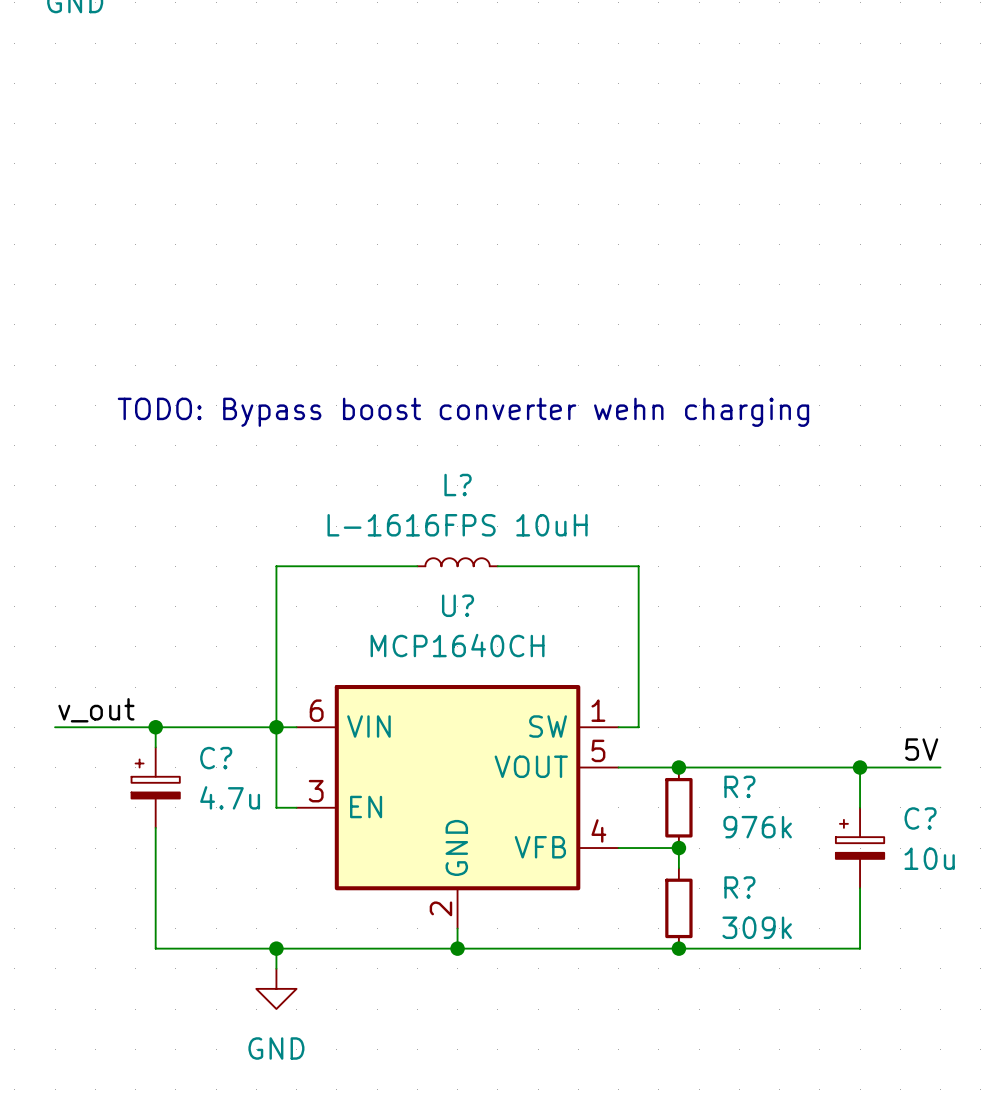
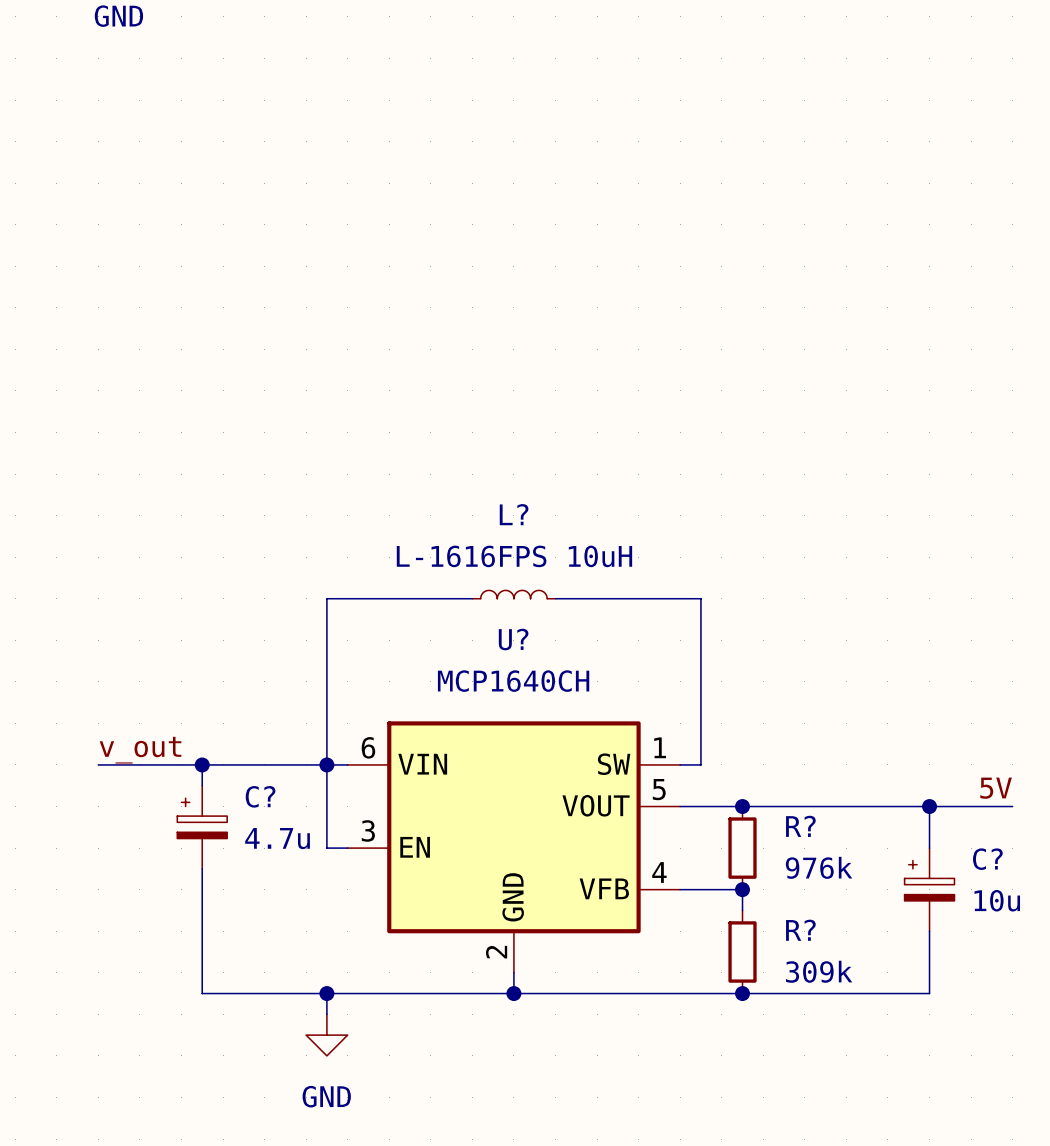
text: TODO: Bypass boost converter wehn charging (463, 412) -> none

